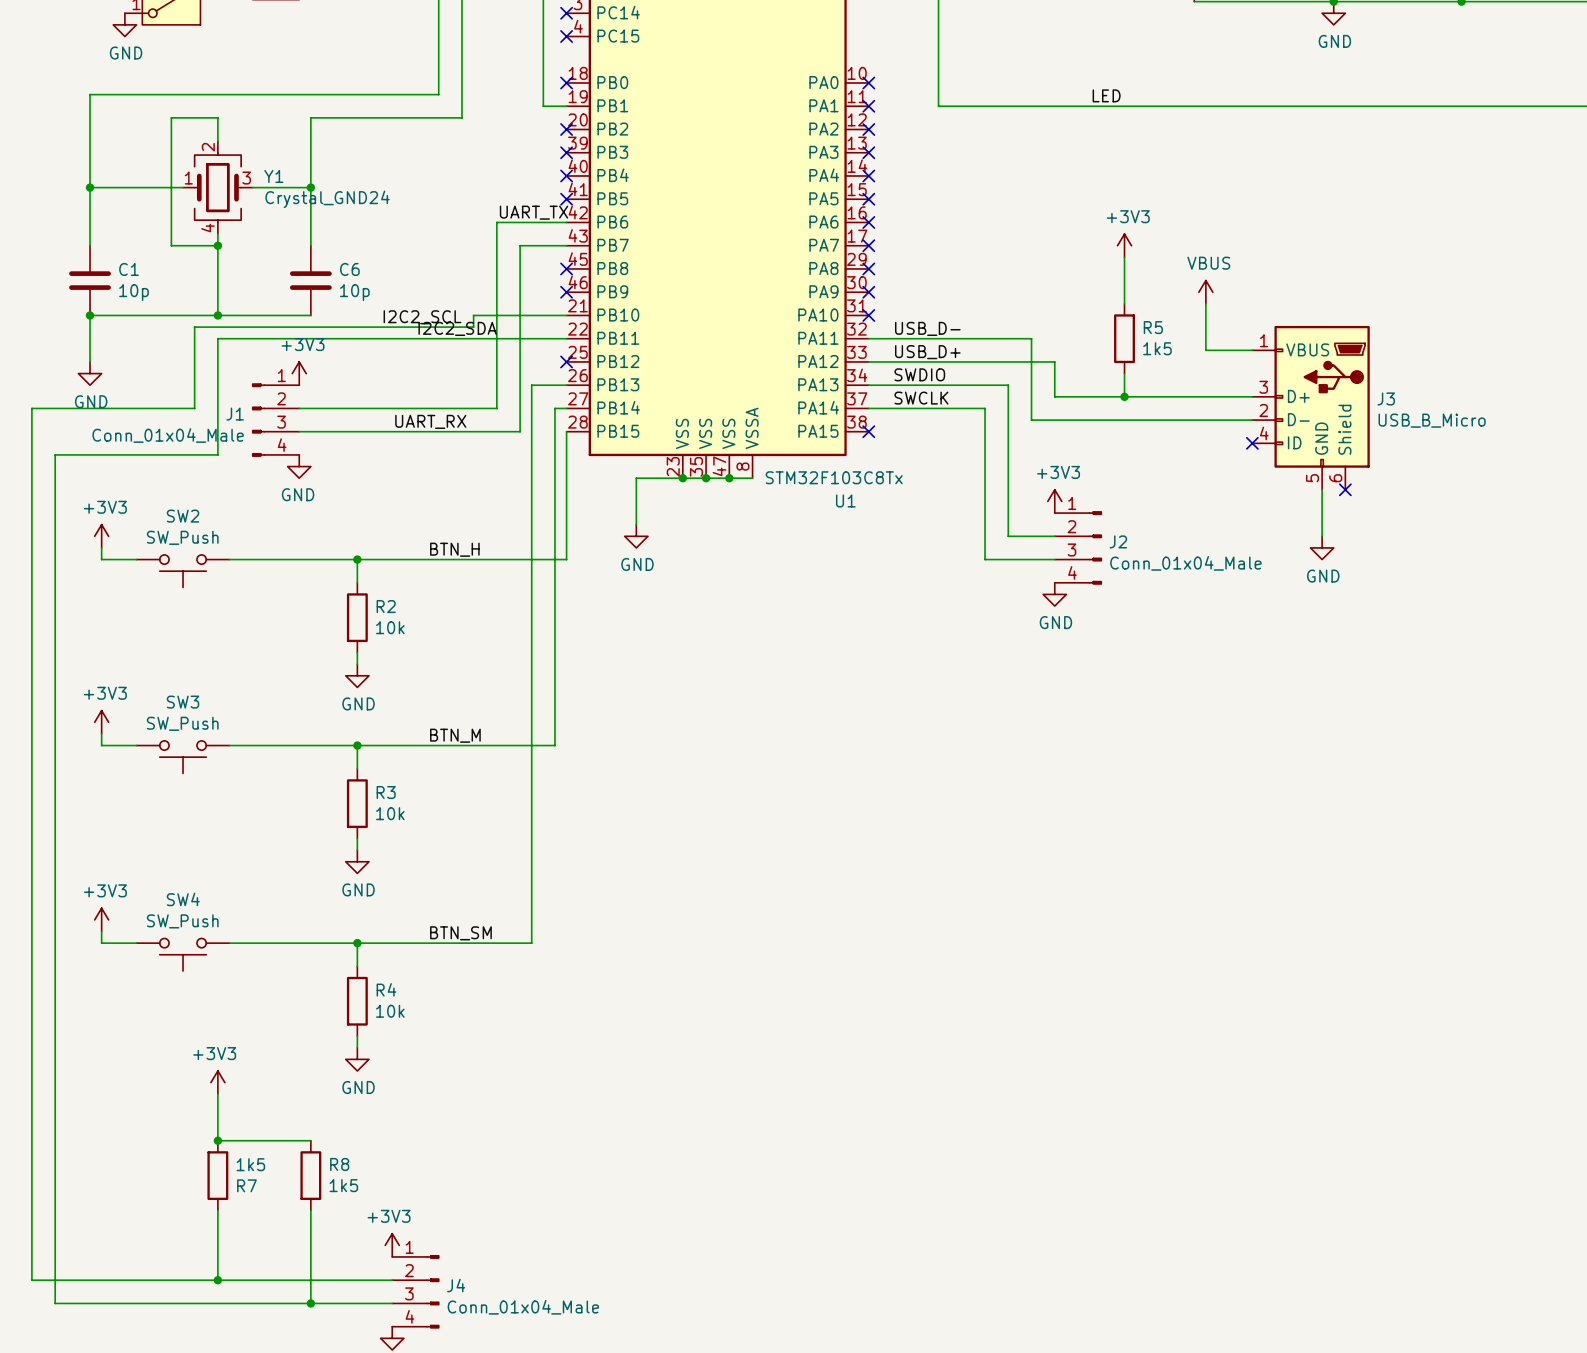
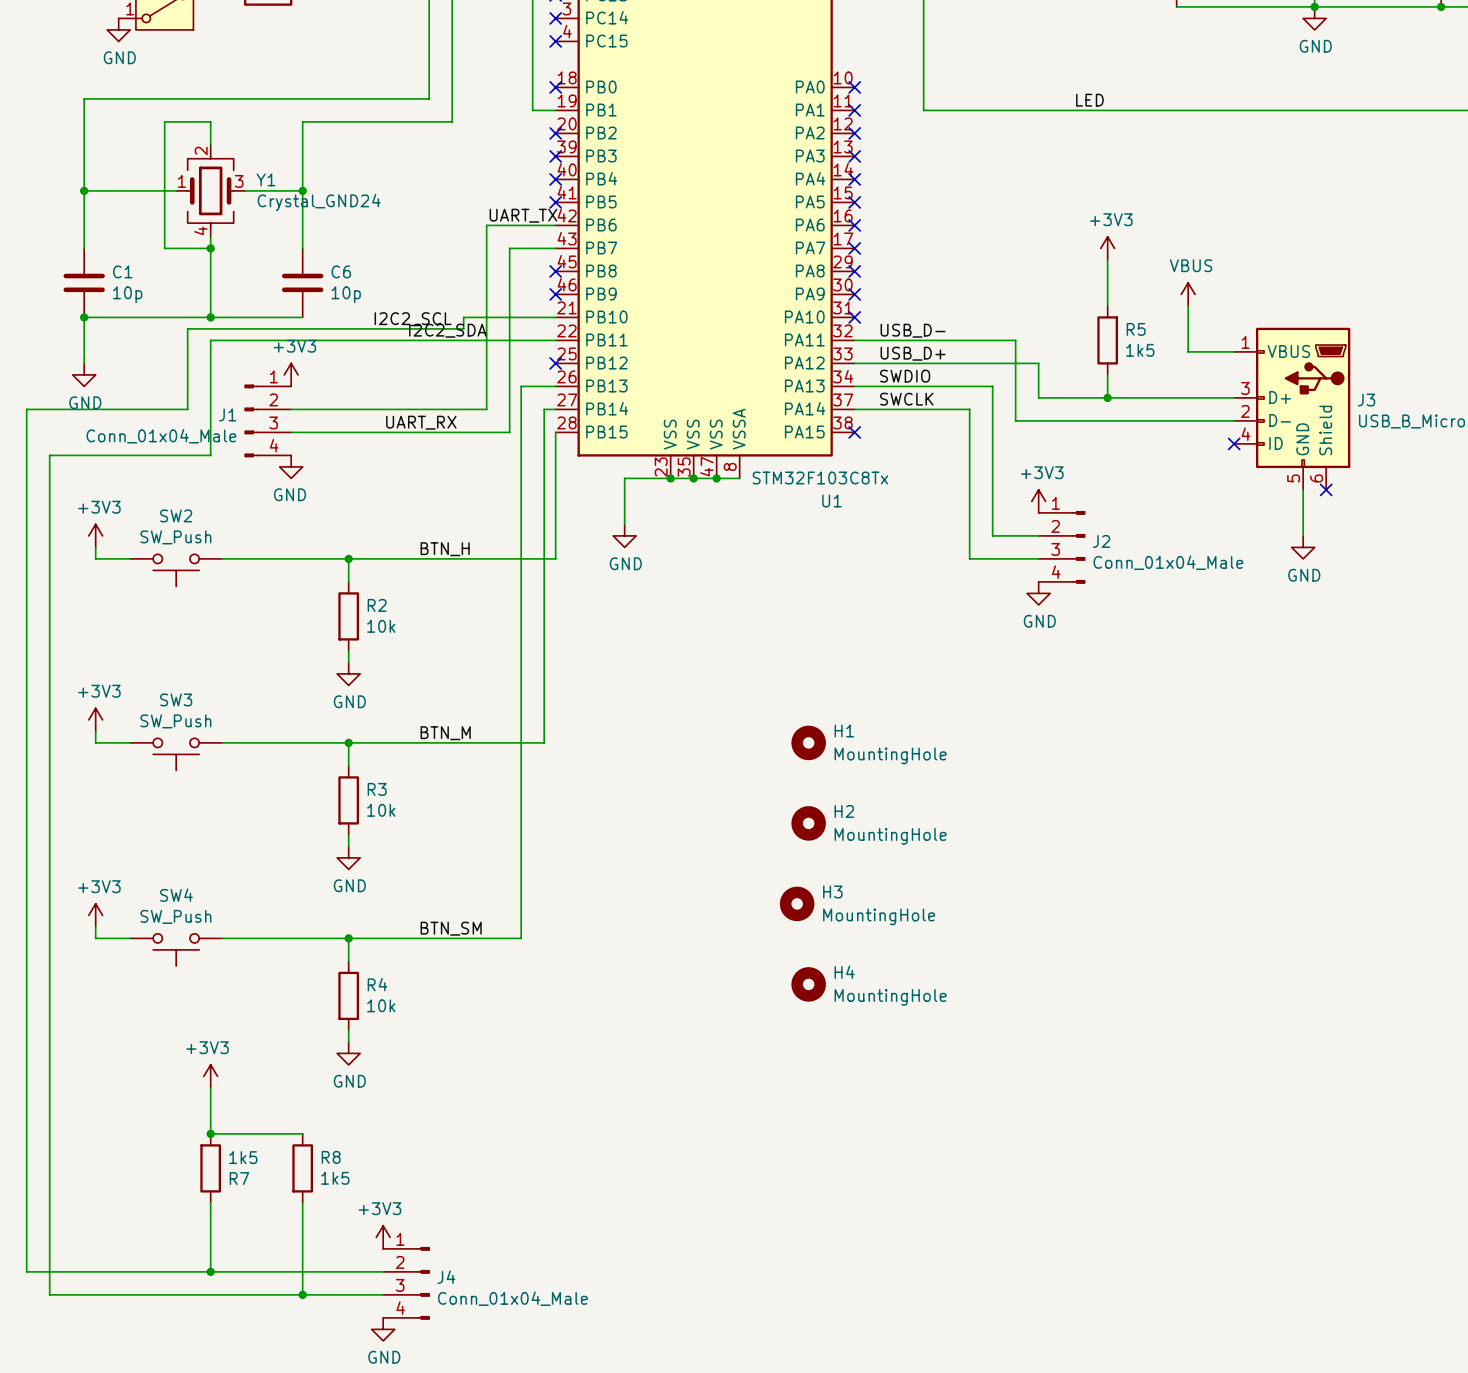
H1: none -> MountingHole (808, 742)
H2: none -> MountingHole (808, 823)
H3: none -> MountingHole (797, 903)
H4: none -> MountingHole (808, 984)

